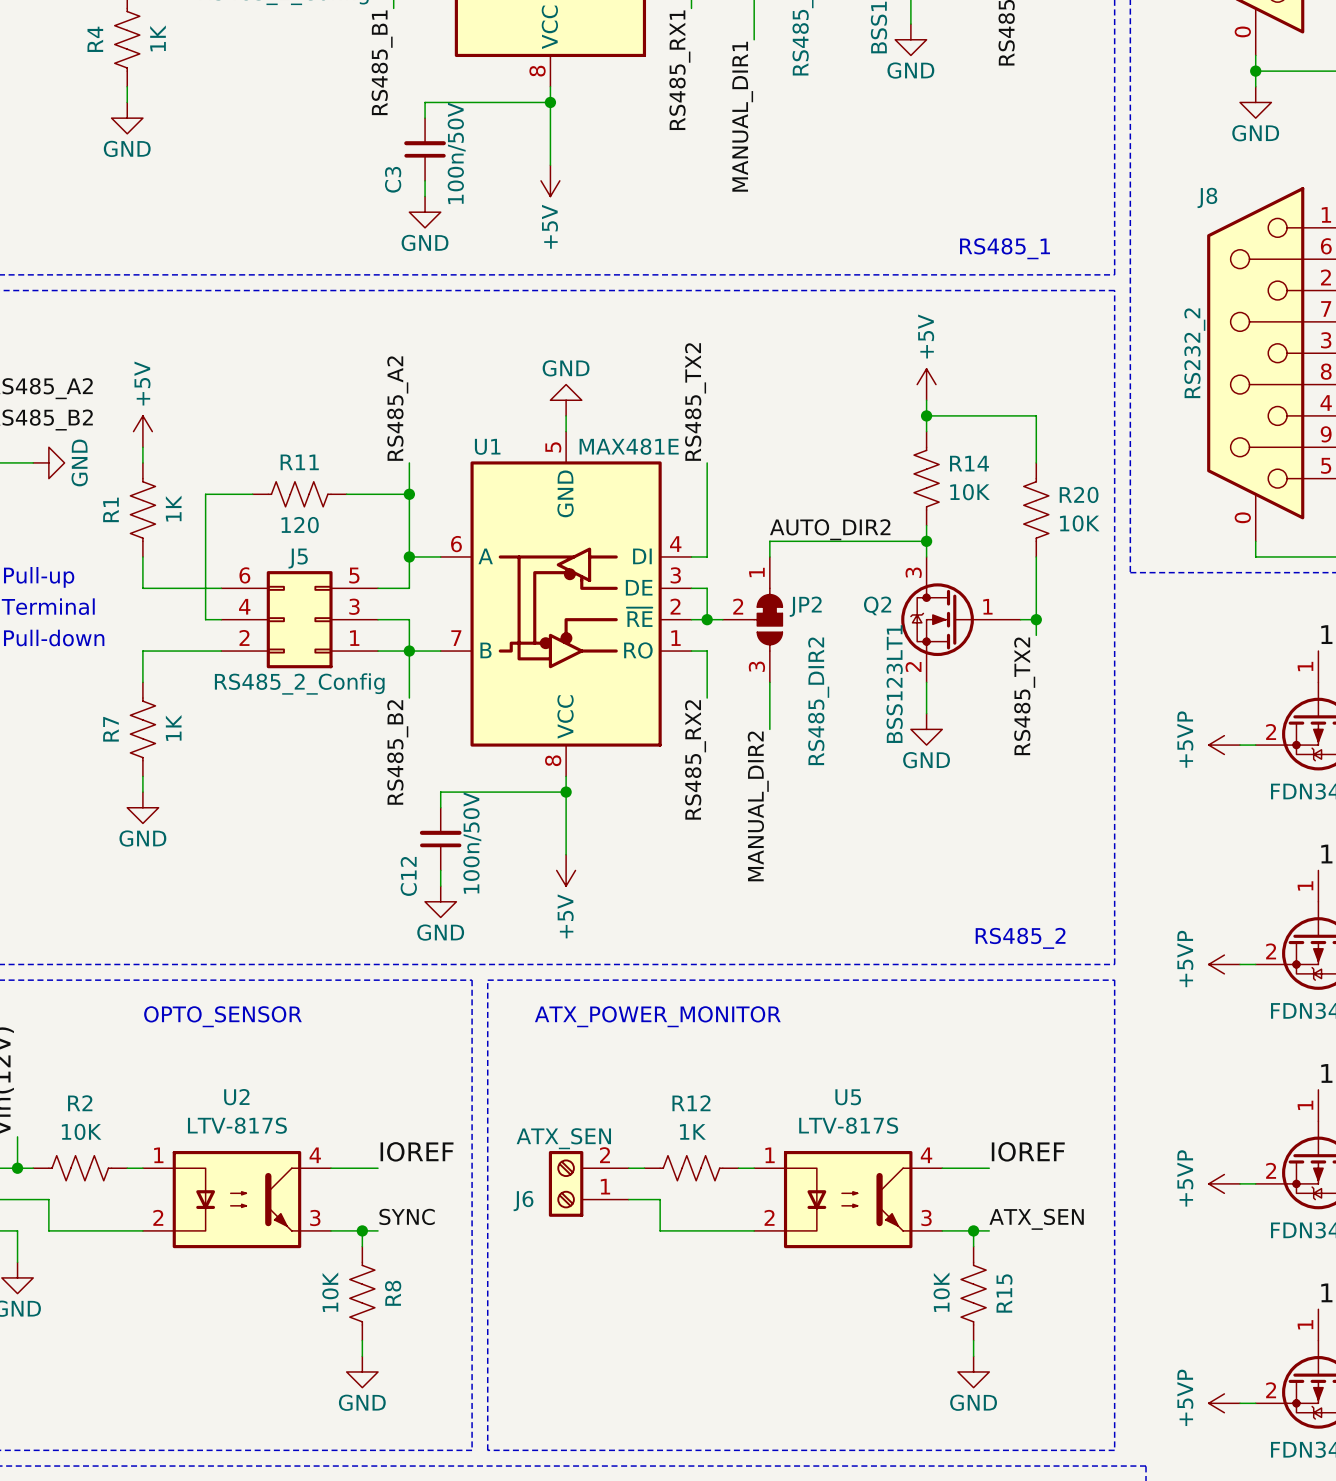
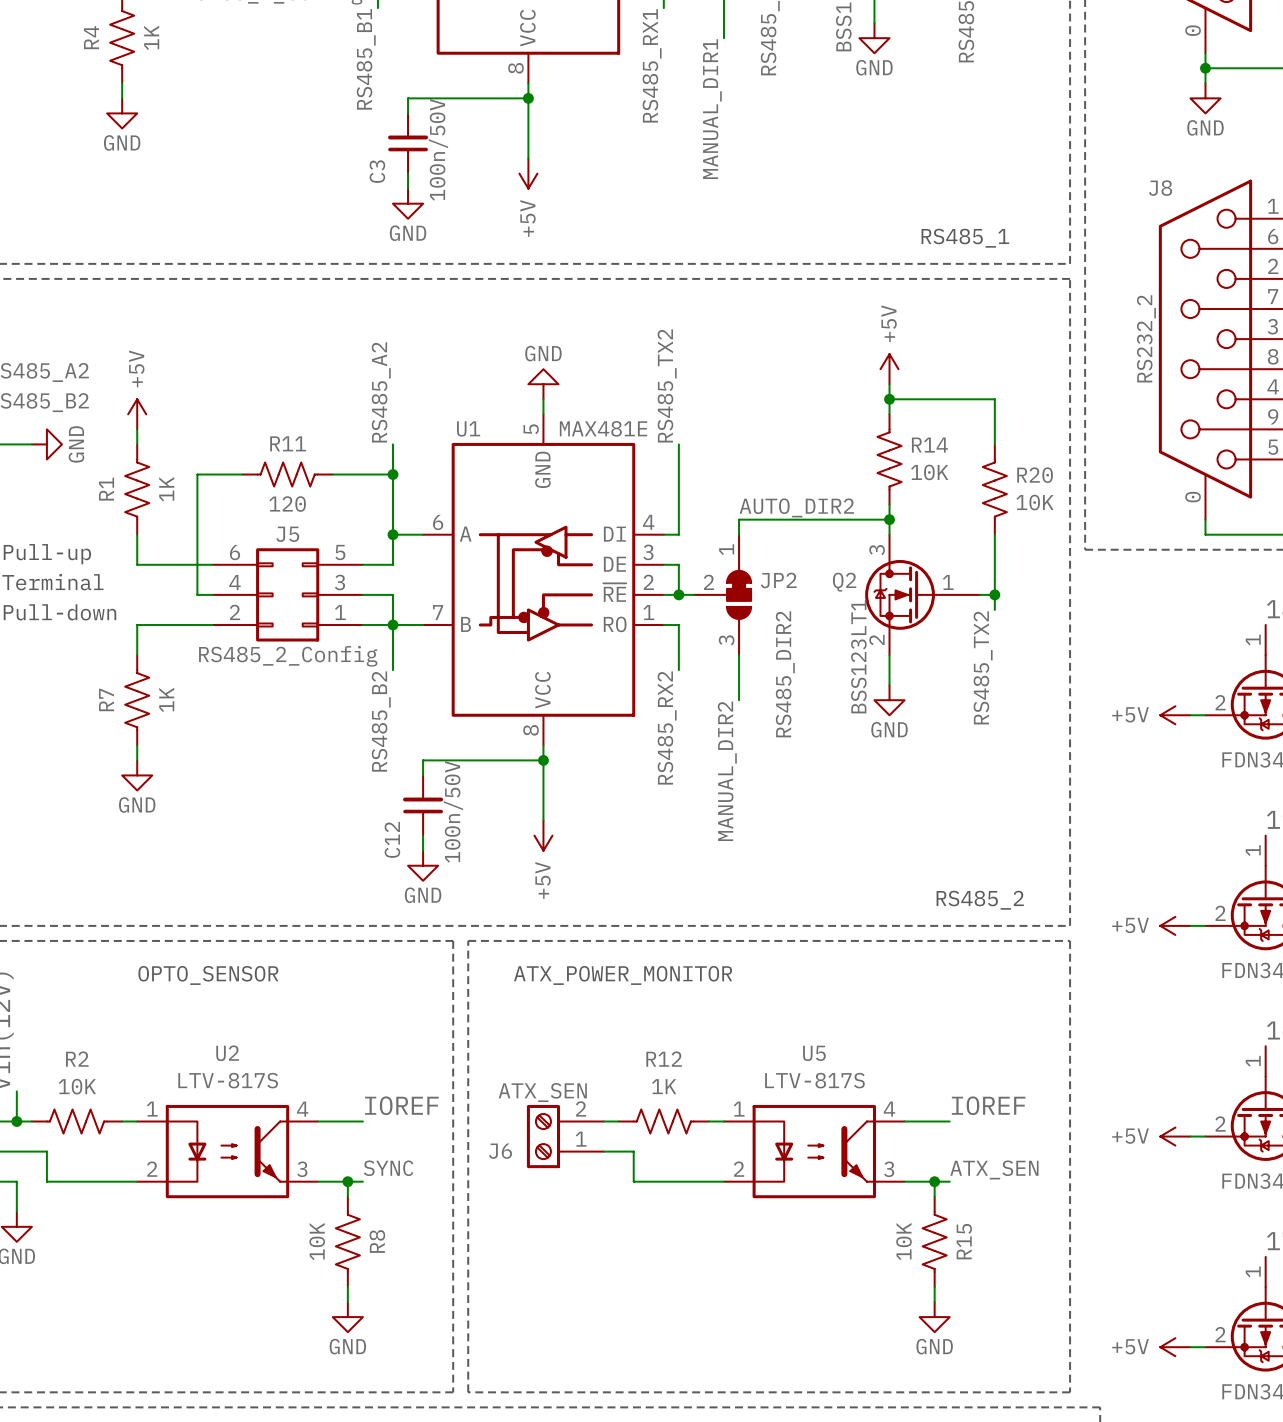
power symbol: +5VP (1224, 745) -> +5V (1175, 715)
power symbol: +5VP (1224, 964) -> +5V (1175, 925)
power symbol: +5VP (1224, 1183) -> +5V (1175, 1136)
power symbol: +5VP (1224, 1403) -> +5V (1175, 1347)

